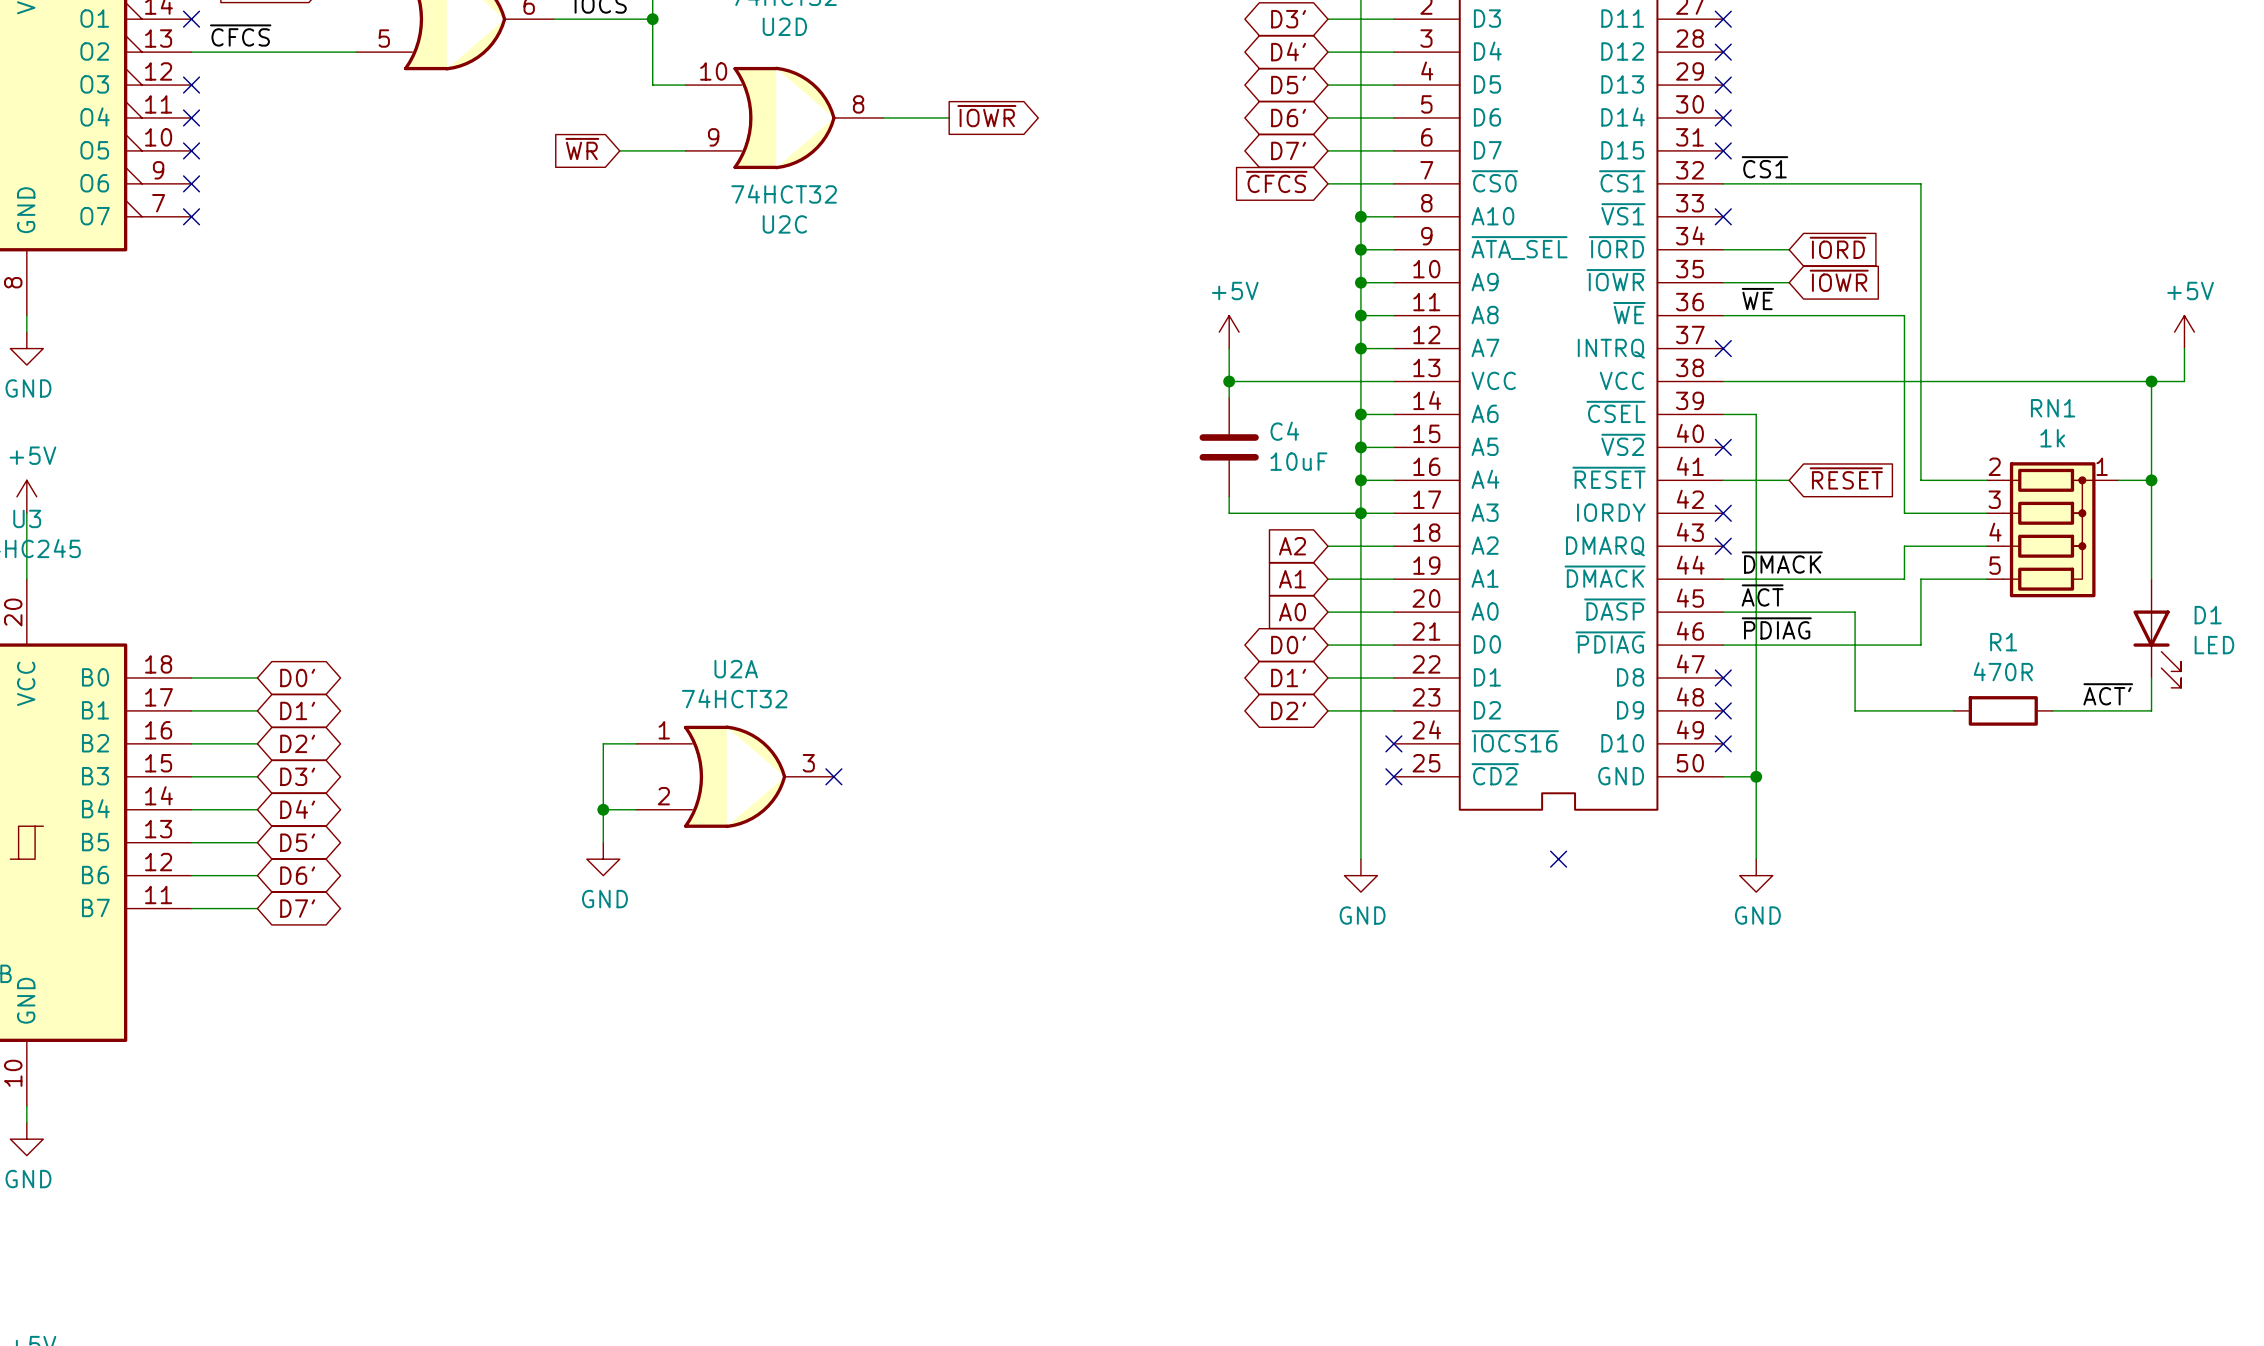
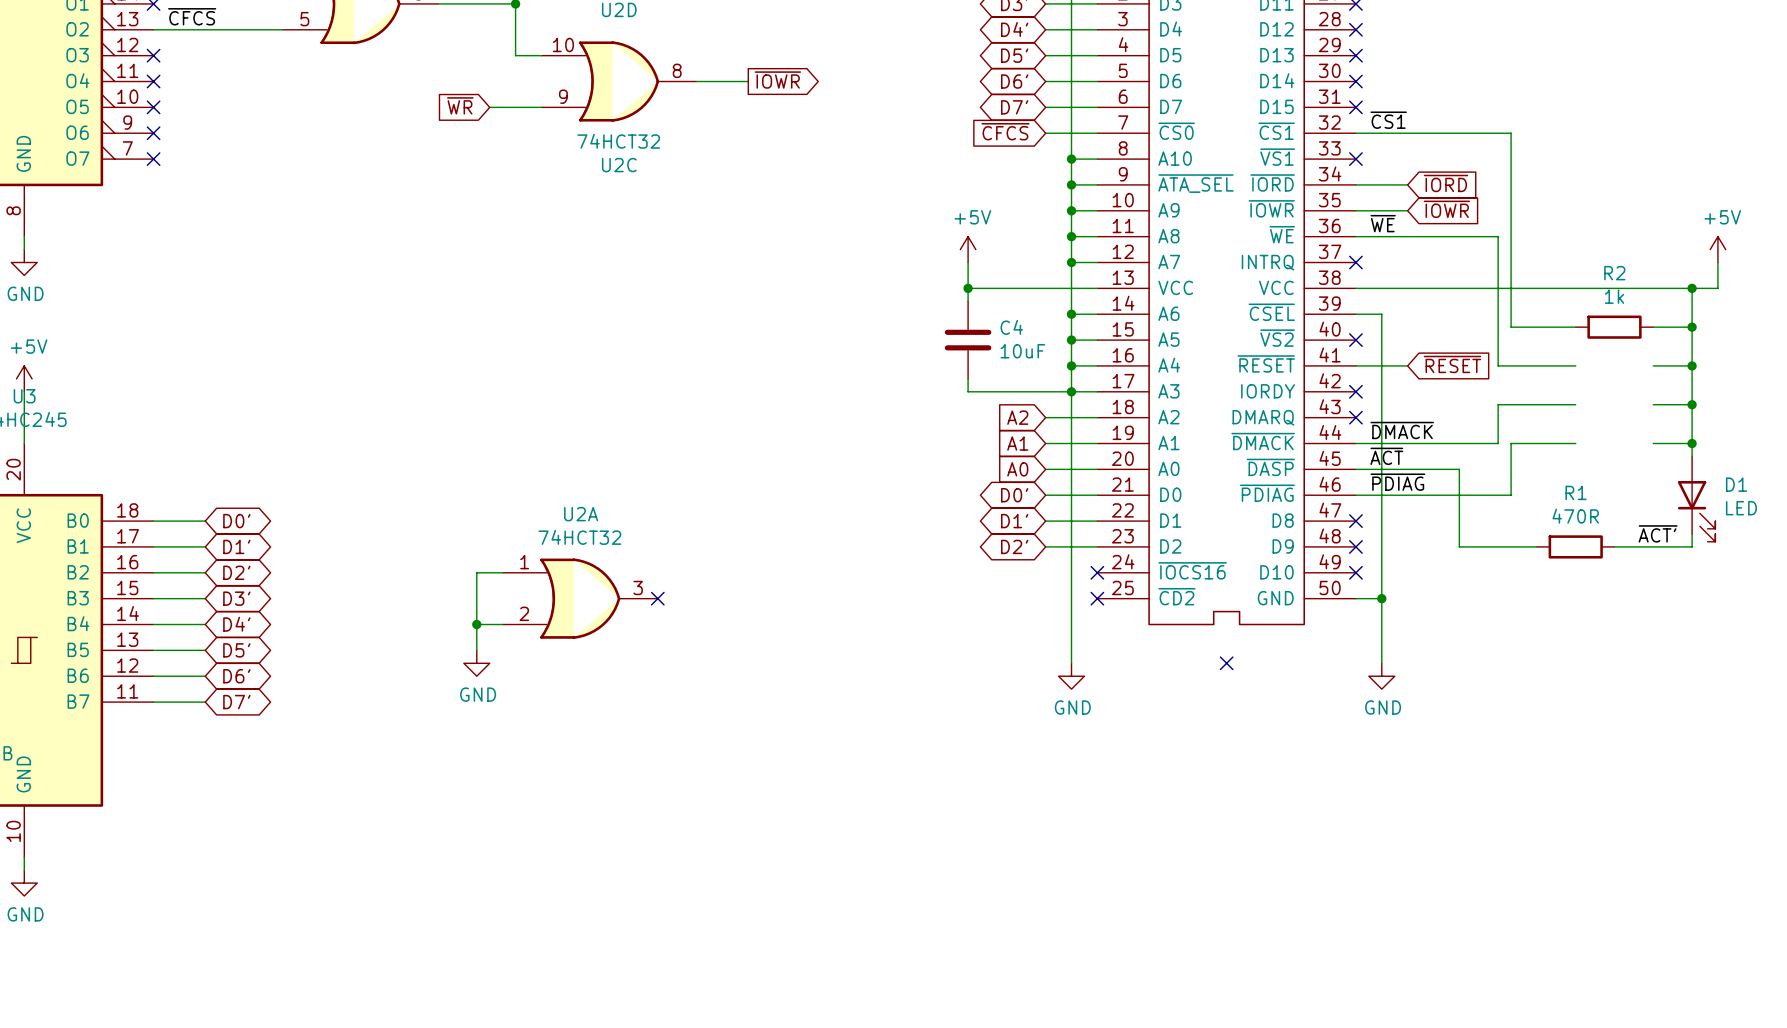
wire: (1920, 430) (1920, 480) -> (1498, 365) (1511, 365)
wire: none -> (1511, 327) (1575, 327)
R2: none -> 1k (1614, 327)
wire: none -> (1653, 327) (1692, 327)
junction: none -> (1692, 327)
wire: (1904, 480) (1904, 513) (1986, 513) -> none
RN1: 1k (2052, 529) -> none
wire: none -> (1653, 404) (1692, 404)
junction: none -> (1692, 404)
wire: (1904, 546) (1986, 546) -> (1498, 417) (1498, 404) (1575, 404)
wire: none -> (1653, 443) (1692, 443) (1692, 456)
junction: none -> (1692, 443)
D1 position: (2157, 633) -> (1696, 499)

